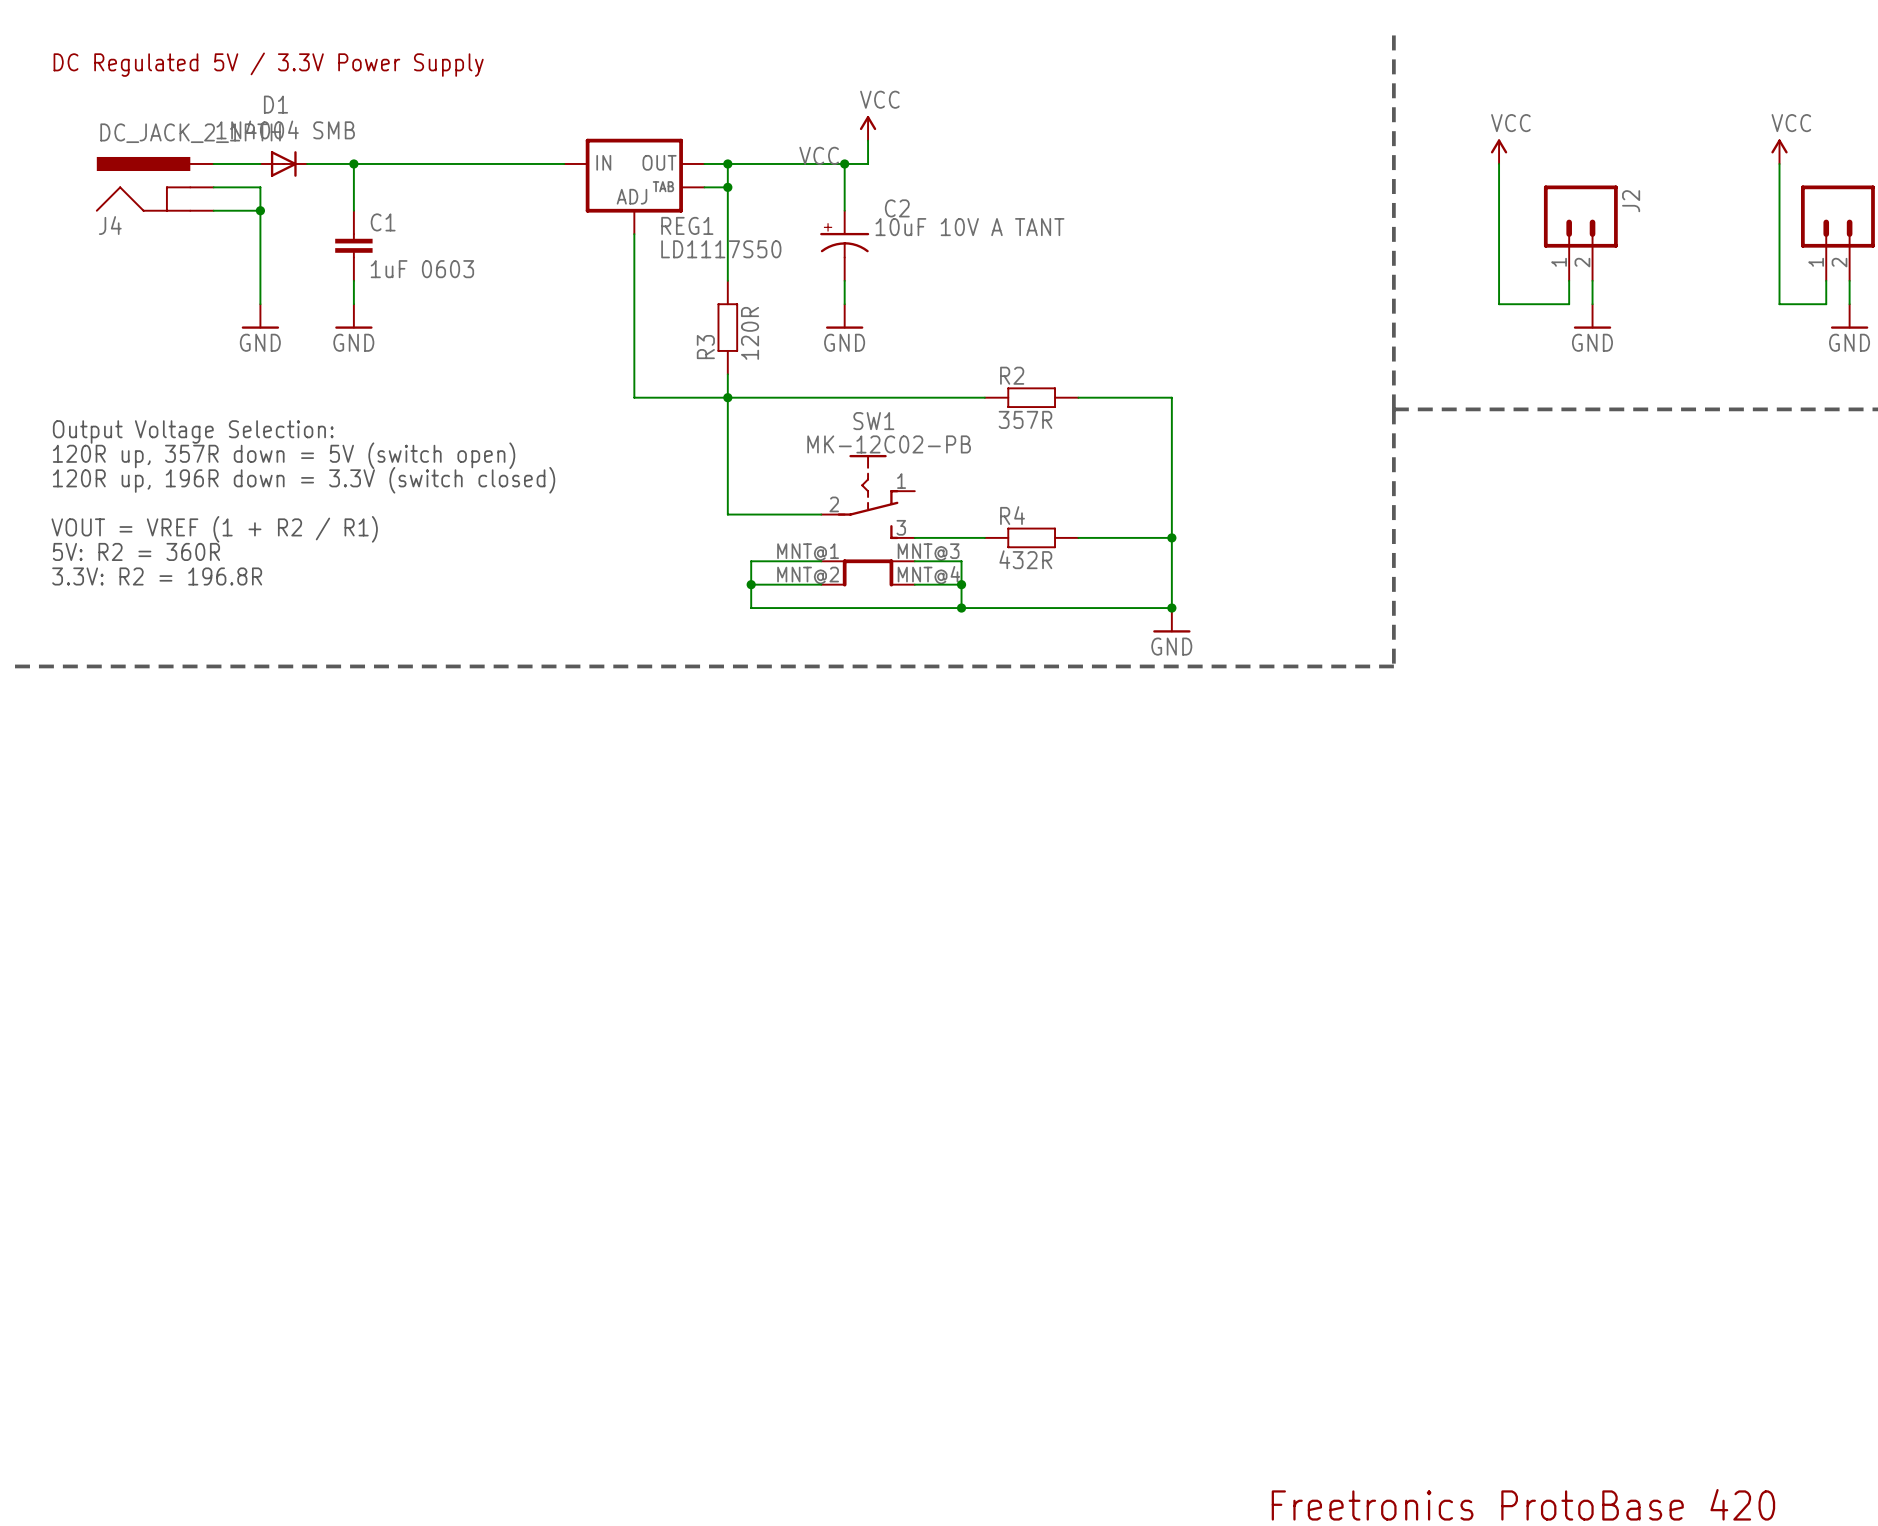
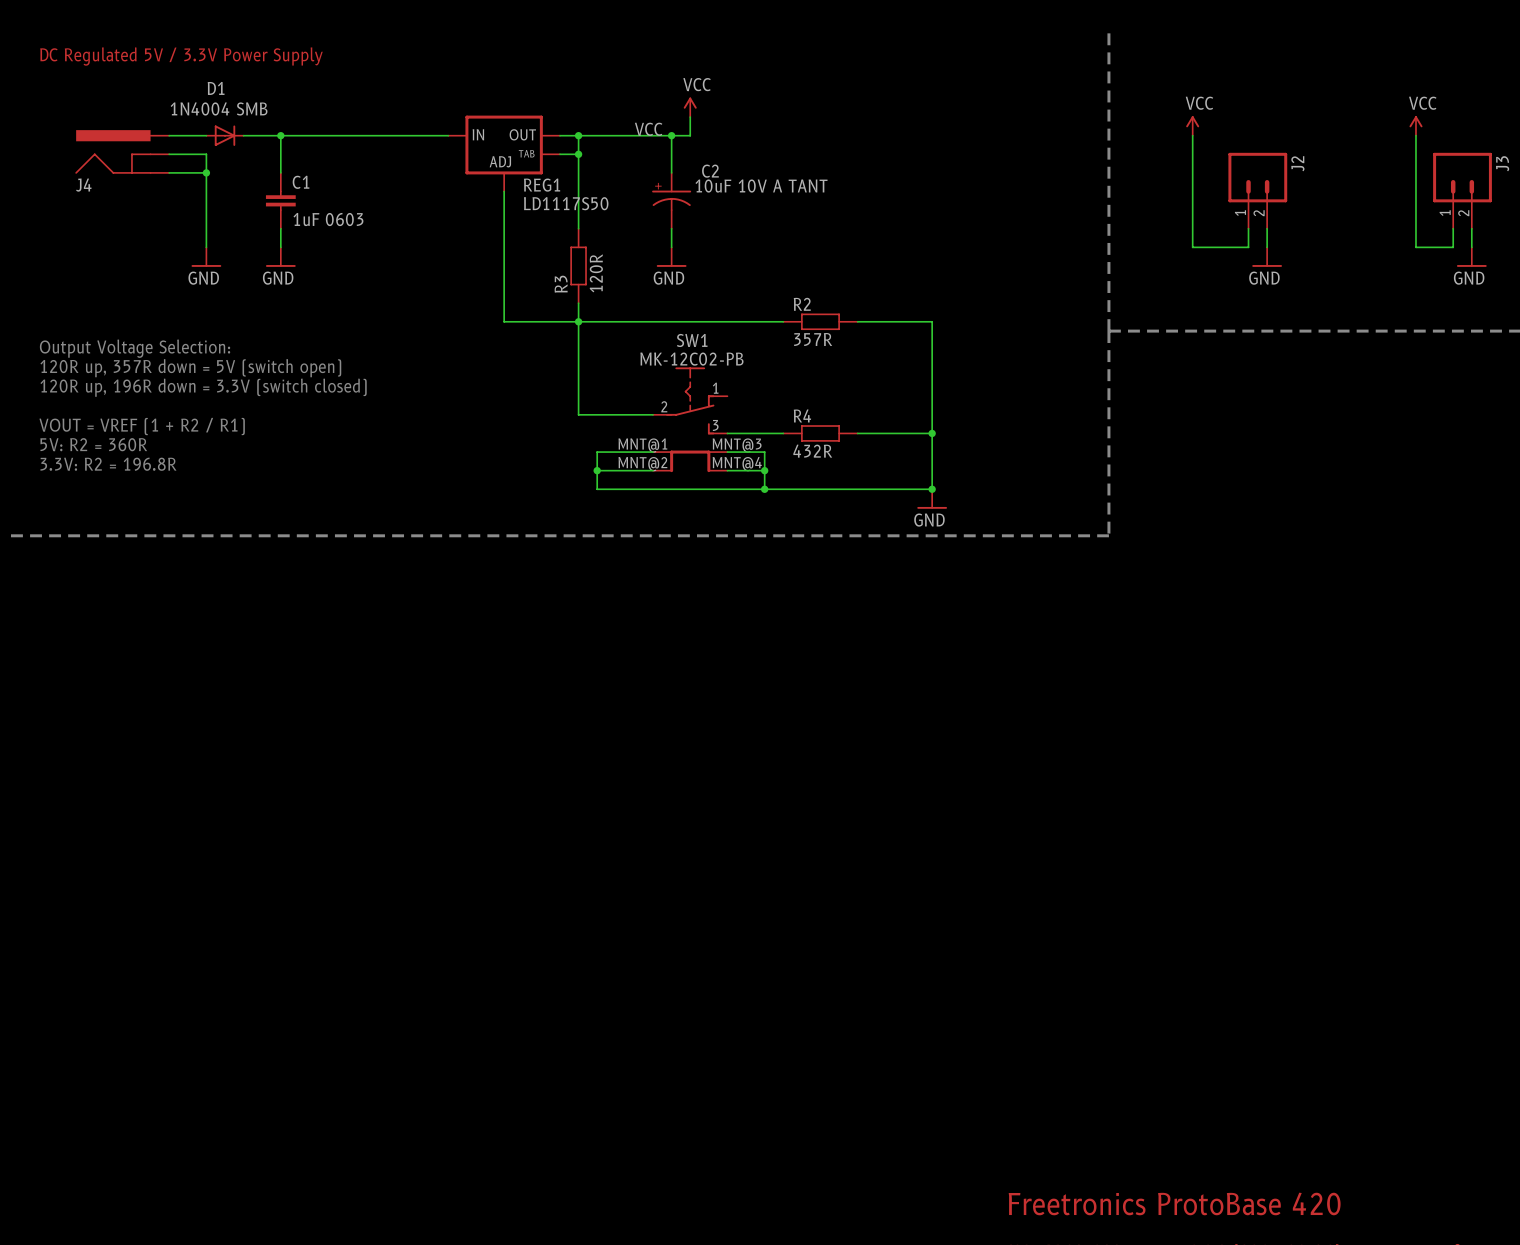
J4 value: DC_JACK_2_1PTH (190, 133) -> none

